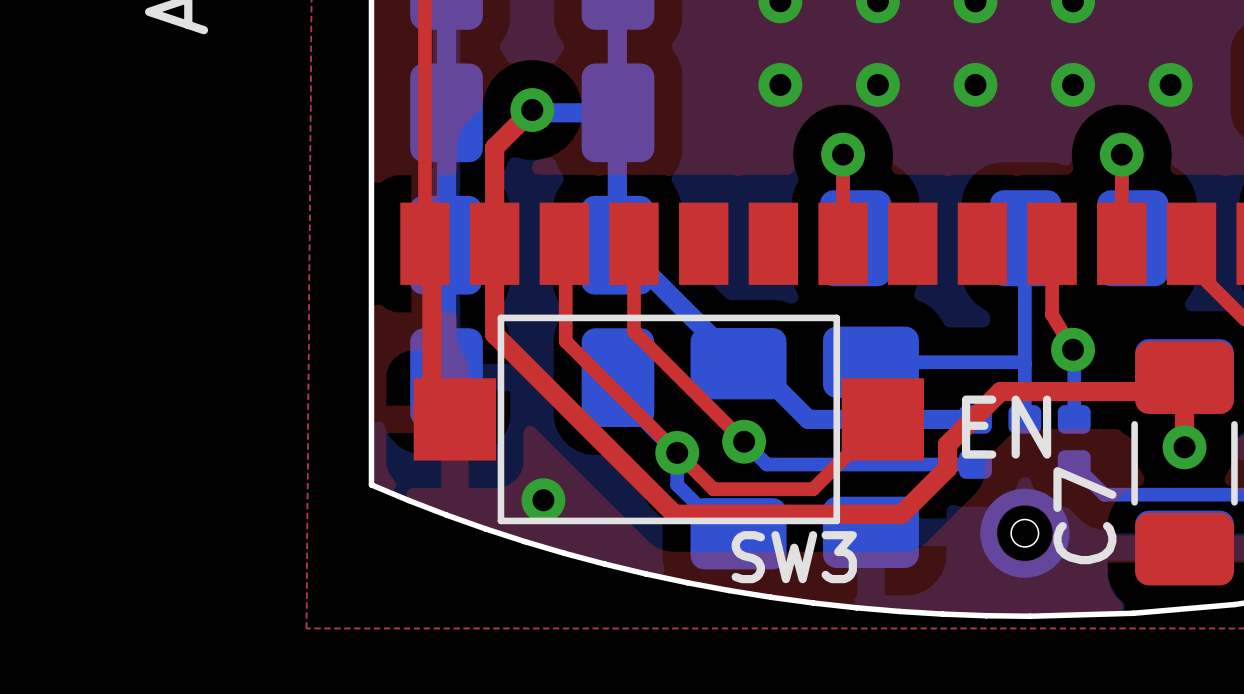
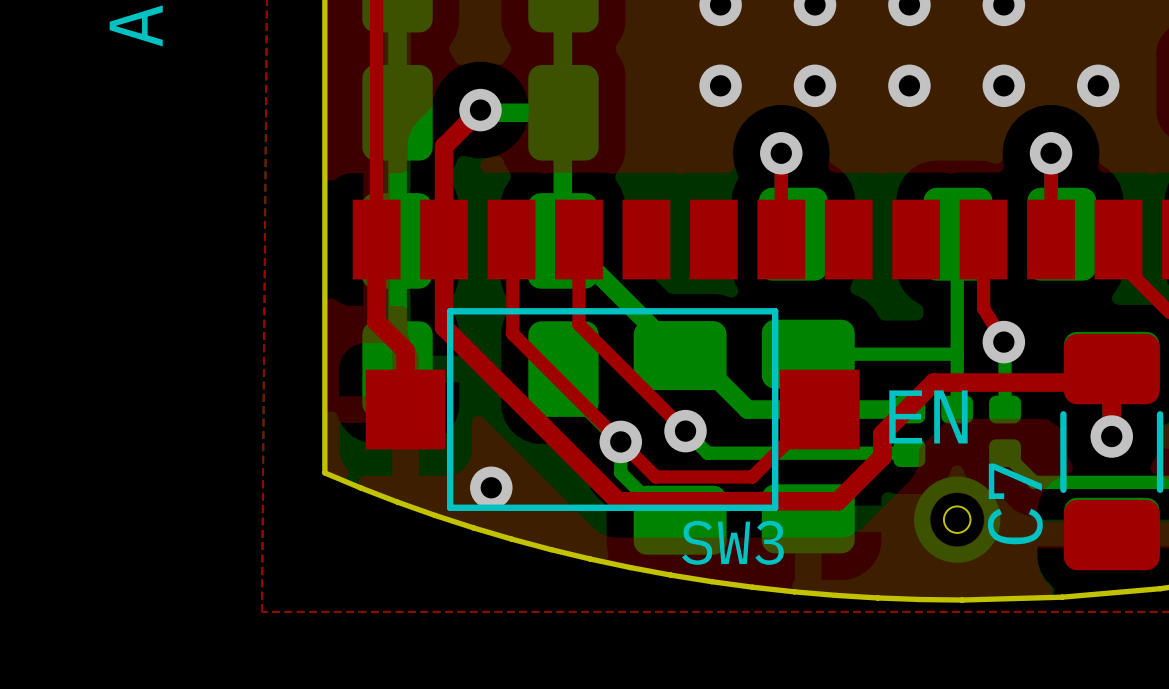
top track: none -> (376, 239) (376, 321) (405, 350) (405, 409)
top track: (431, 250) (431, 396) -> none

